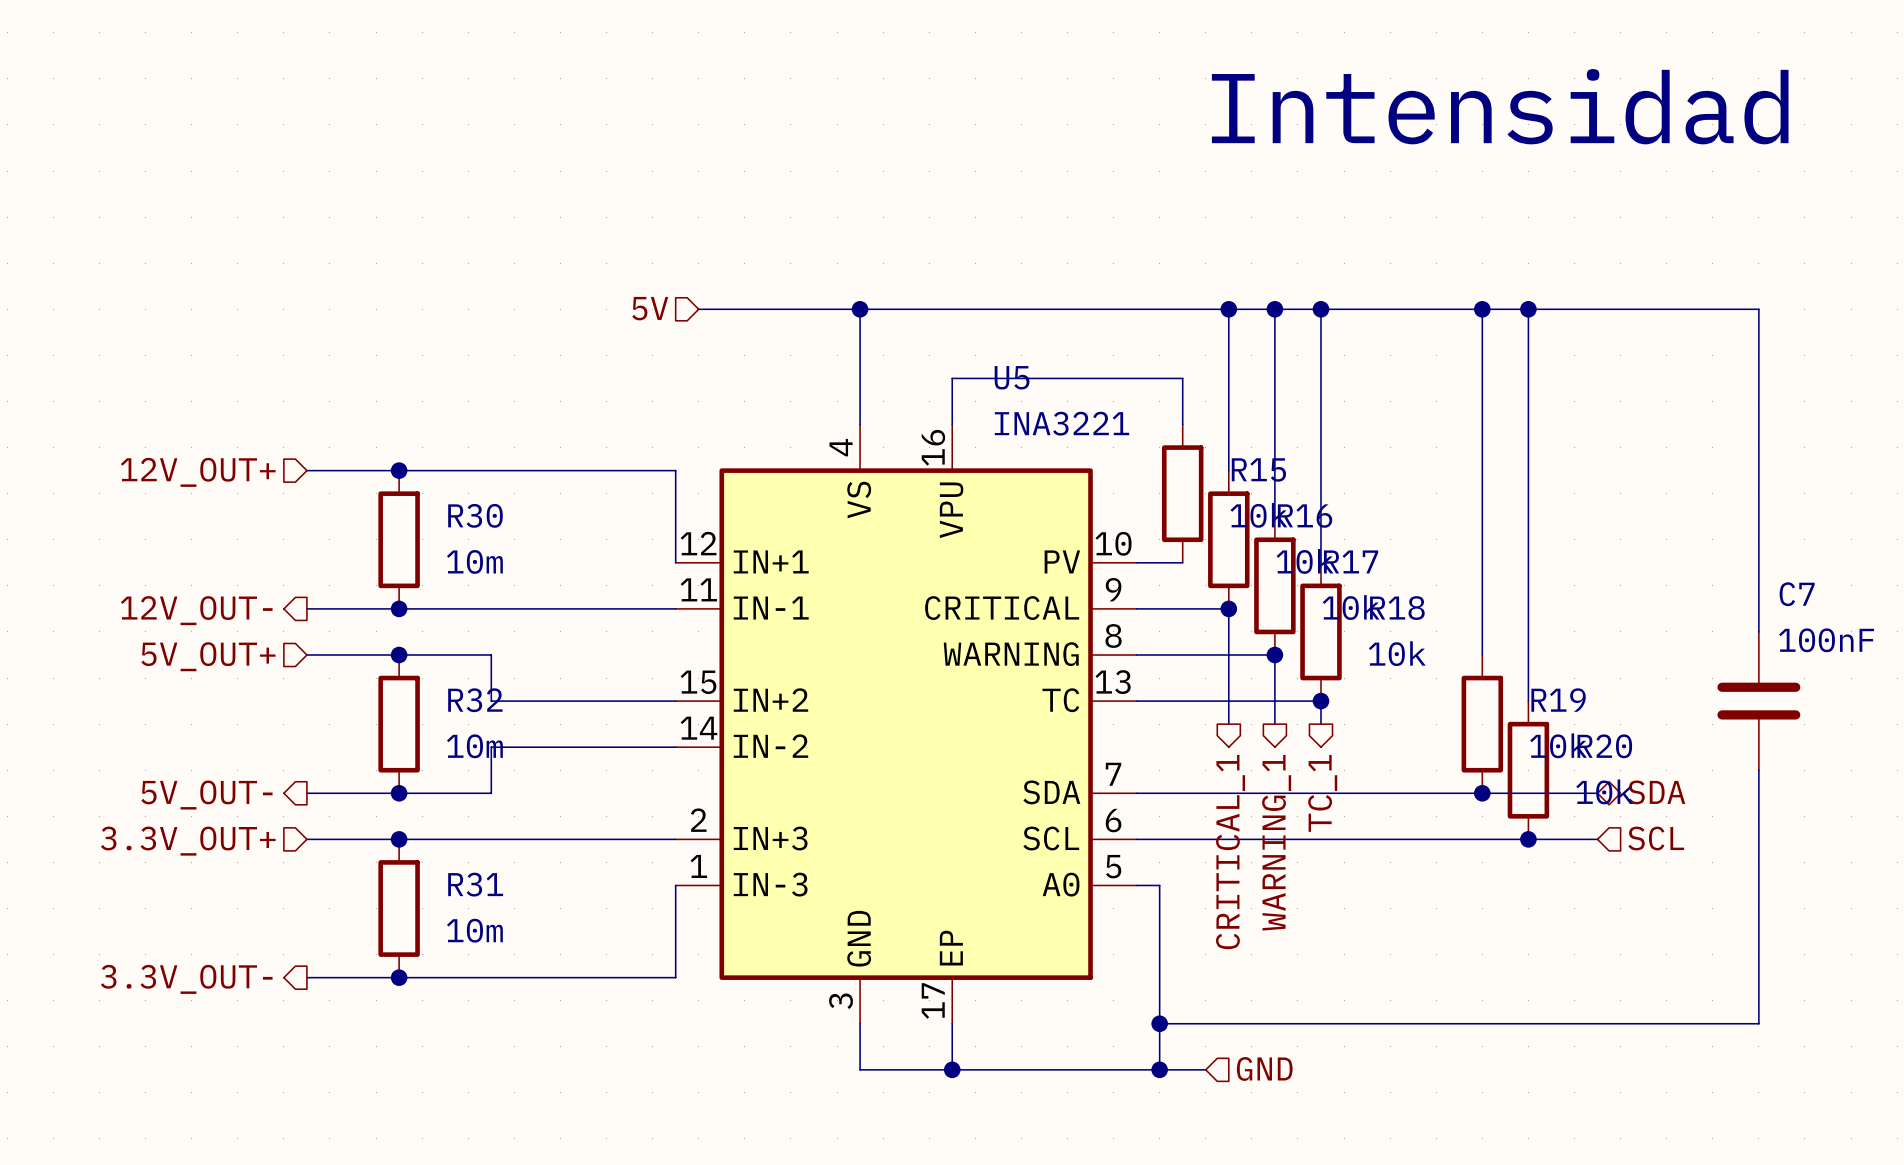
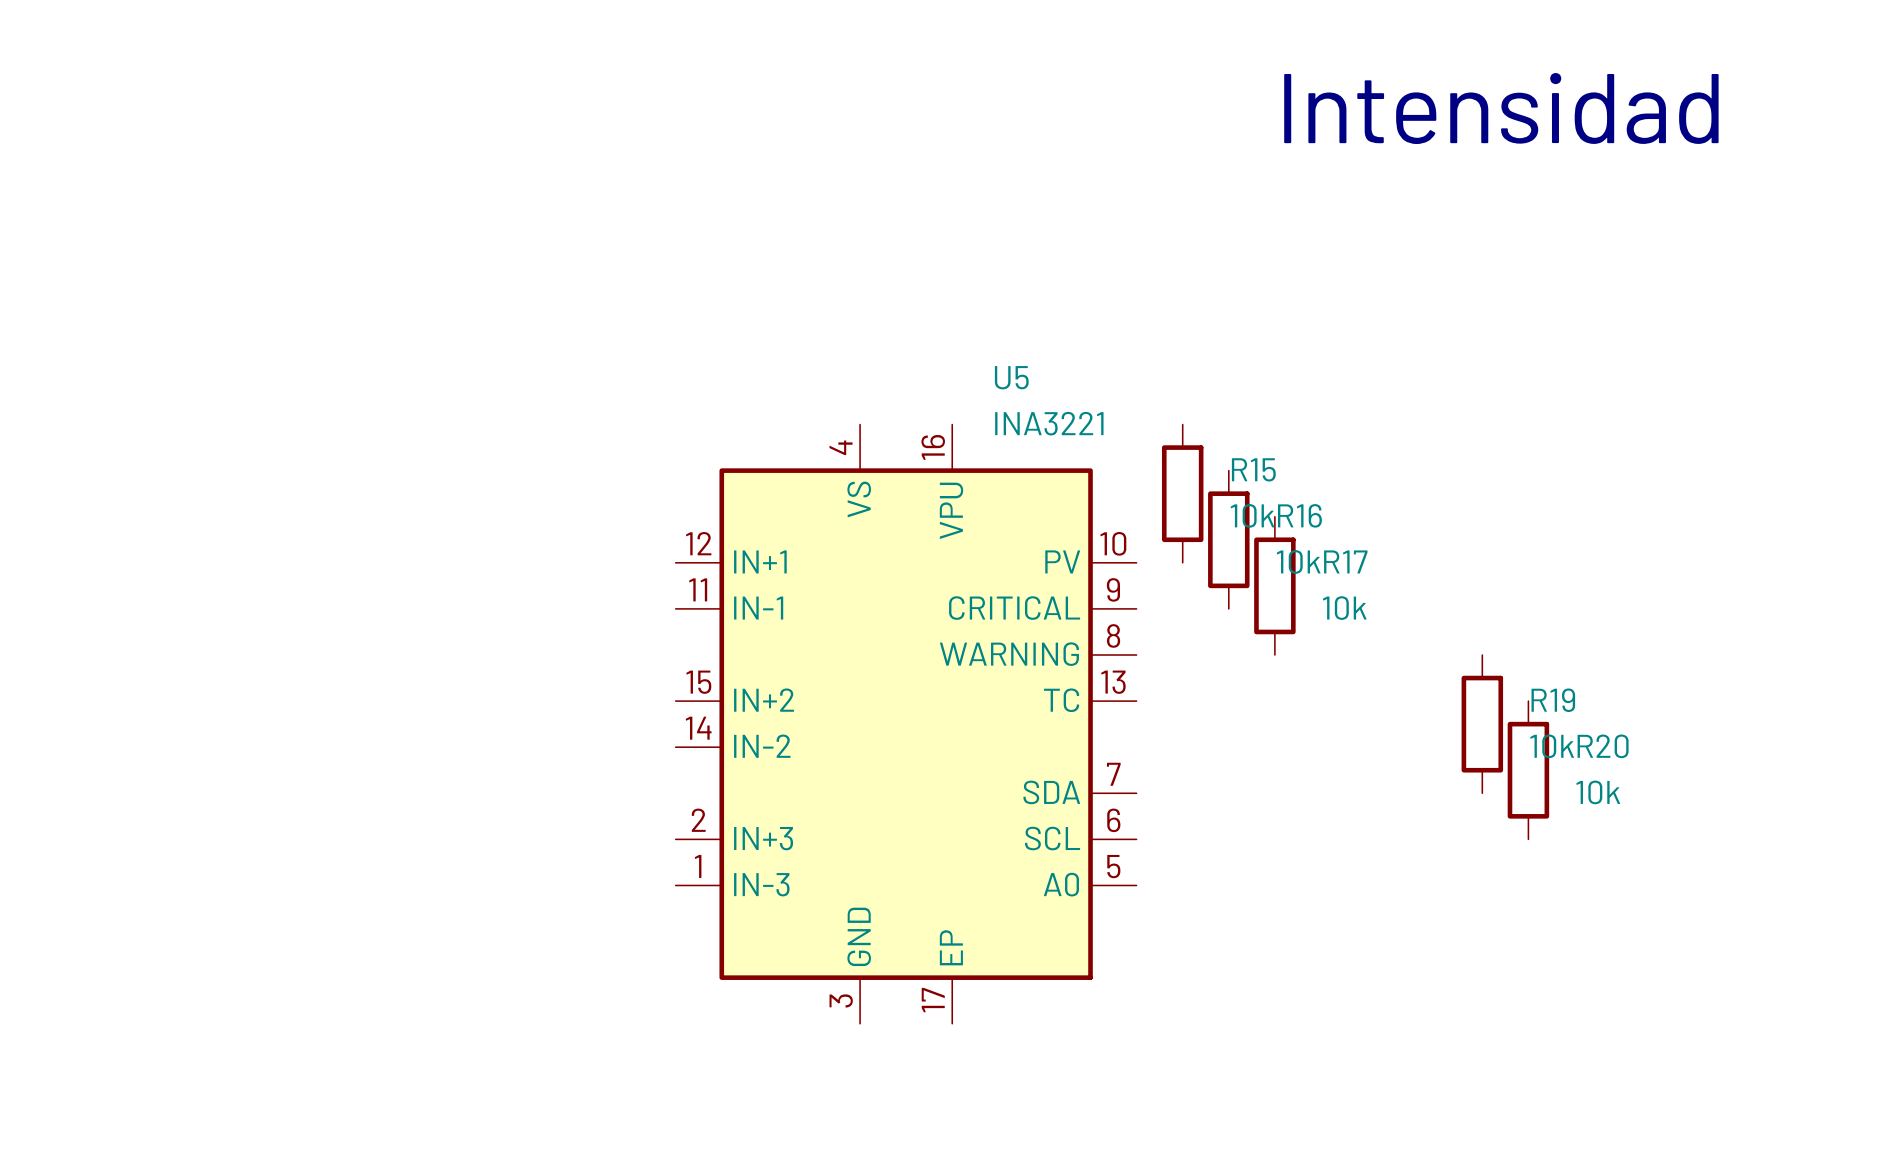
hierarchical label: 5V (650, 308) -> none
wire: (698, 309) (1758, 309) (1758, 631) -> none
wire: (860, 309) (860, 424) -> none
junction: (860, 309) -> none
wire: (1228, 309) (1228, 470) -> none
junction: (1228, 309) -> none
wire: (1274, 309) (1274, 516) -> none
junction: (1274, 309) -> none
wire: (1320, 309) (1320, 562) -> none
junction: (1320, 309) -> none
wire: (1482, 309) (1482, 655) -> none
junction: (1482, 309) -> none
wire: (1528, 309) (1528, 701) -> none
junction: (1528, 309) -> none
wire: (952, 424) (952, 378) (1182, 378) (1182, 424) -> none
wire: (306, 470) (675, 470) (675, 562) -> none
junction: (399, 470) -> none
hierarchical label: 12V_OUT+ (198, 472) -> none
R30: 10m (399, 539) -> none
wire: (1136, 562) (1182, 562) -> none
wire: (306, 608) (675, 608) -> none
junction: (399, 608) -> none
wire: (1136, 608) (1228, 608) (1228, 724) -> none
junction: (1228, 608) -> none
hierarchical label: 12V_OUT- (196, 610) -> none
R18: 10k (1320, 631) -> none
wire: (306, 655) (491, 655) (491, 701) (675, 701) -> none
junction: (399, 655) -> none
wire: (1136, 655) (1274, 655) (1274, 724) -> none
junction: (1274, 655) -> none
hierarchical label: 5V_OUT+ (208, 656) -> none
wire: (1136, 701) (1320, 701) (1320, 724) -> none
junction: (1320, 701) -> none
C7: 100nF (1758, 701) -> none
R32: 10m (399, 724) -> none
wire: (675, 747) (491, 747) (491, 793) (306, 793) -> none
wire: (1758, 770) (1758, 1023) (1159, 1023) -> none
hierarchical label: SDA (1656, 792) -> none
junction: (399, 793) -> none
wire: (1136, 793) (1597, 793) -> none
hierarchical label: TC_1 (1322, 793) -> none
junction: (1482, 793) -> none
hierarchical label: 5V_OUT- (206, 795) -> none
hierarchical label: SCL (1656, 838) -> none
wire: (306, 839) (675, 839) -> none
junction: (399, 839) -> none
wire: (1136, 839) (1597, 839) -> none
junction: (1528, 839) -> none
hierarchical label: 3.3V_OUT+ (188, 841) -> none
hierarchical label: WARNING_1 (1276, 842) -> none
hierarchical label: CRITICAL_1 (1230, 852) -> none
wire: (675, 885) (675, 977) (306, 977) -> none
wire: (1136, 885) (1159, 885) (1159, 1069) -> none
R31: 10m (399, 908) -> none
junction: (399, 977) -> none
hierarchical label: 3.3V_OUT- (186, 979) -> none
wire: (860, 1023) (860, 1069) (1205, 1069) -> none
wire: (952, 1023) (952, 1069) -> none
junction: (1159, 1023) -> none
hierarchical label: GND (1264, 1068) -> none
junction: (952, 1069) -> none
junction: (1159, 1069) -> none

